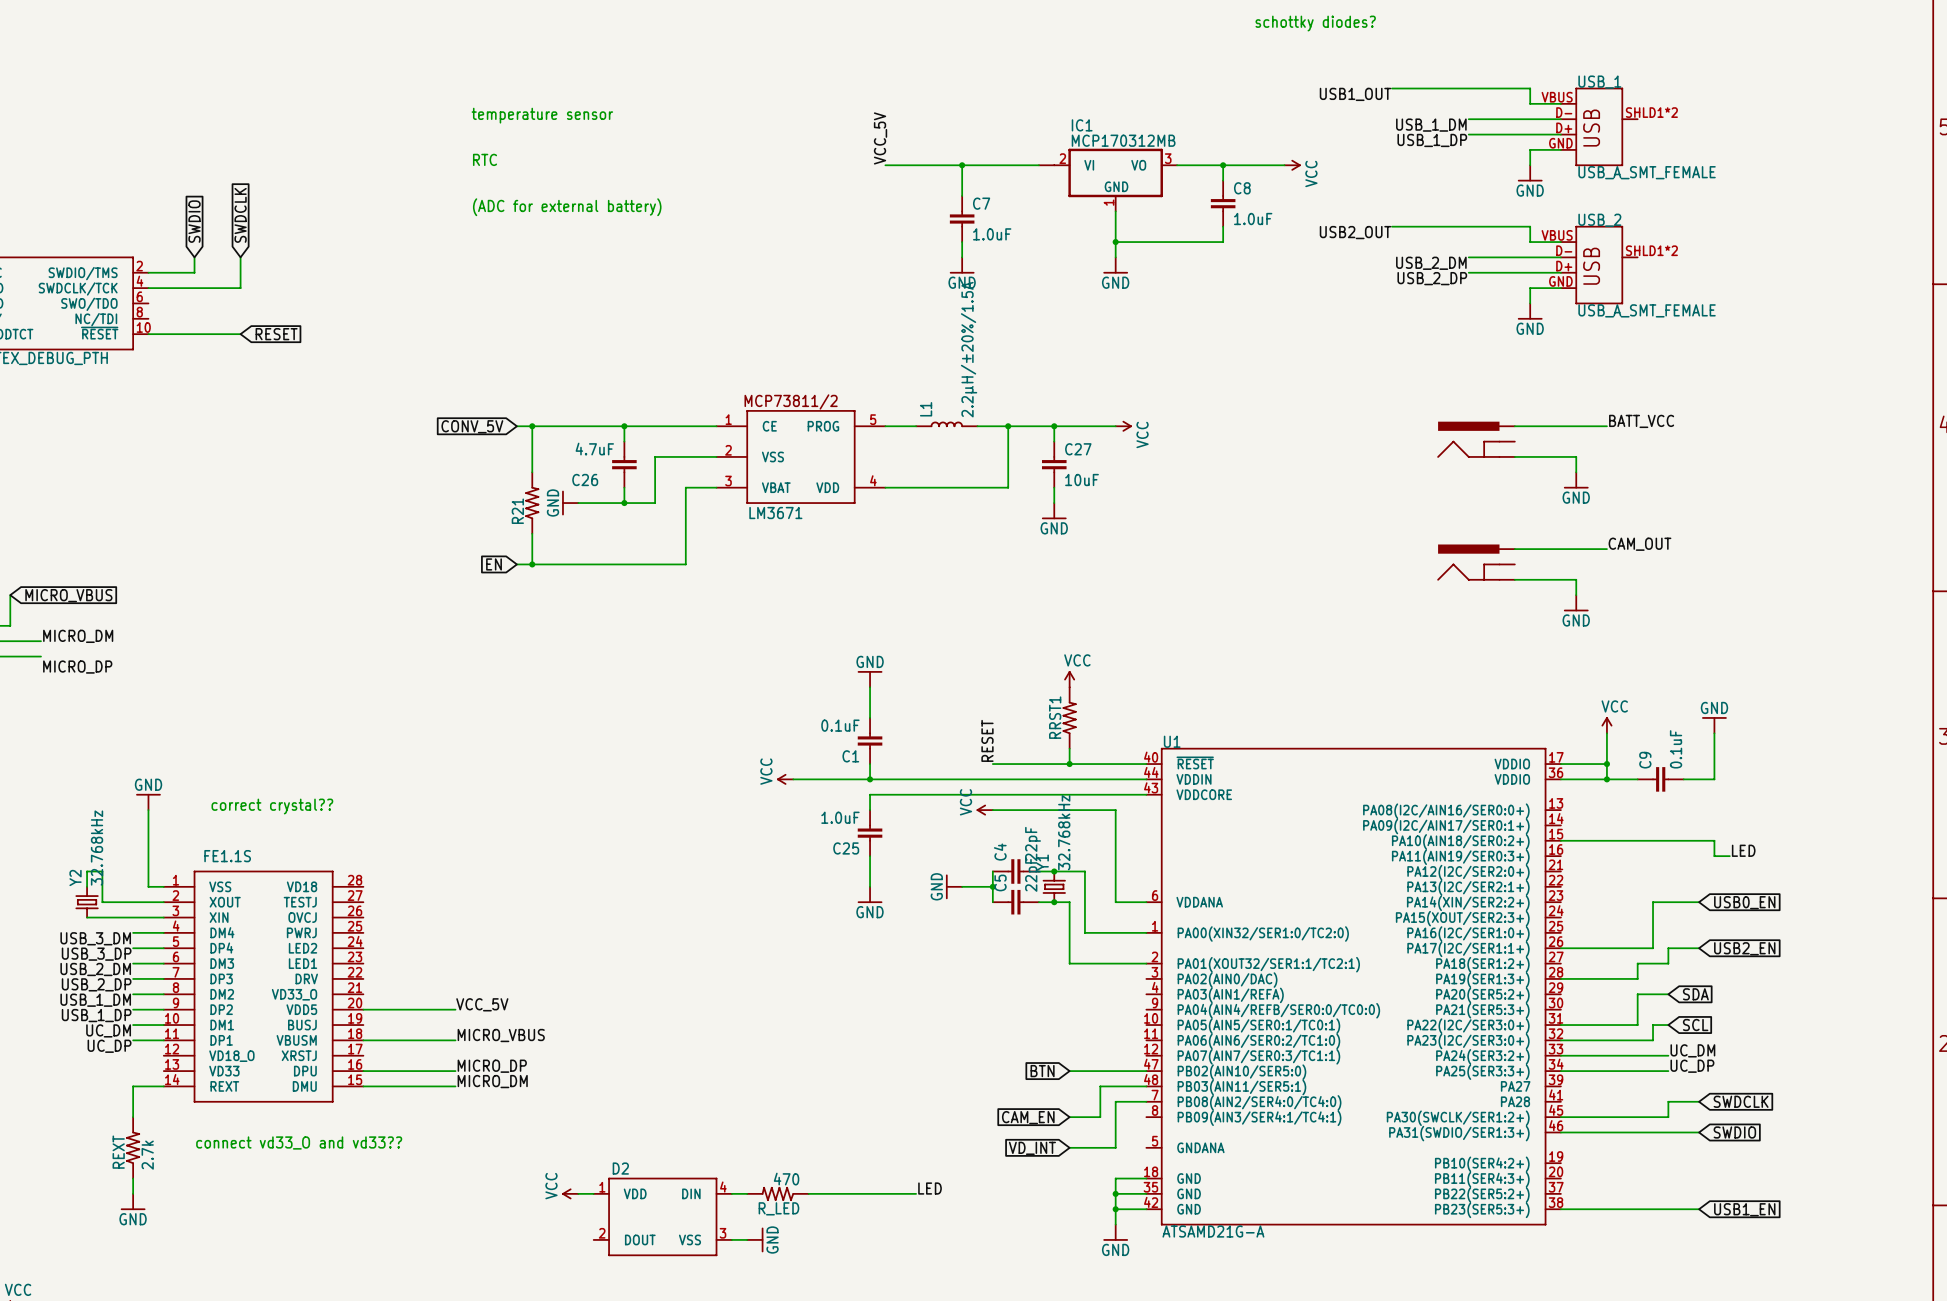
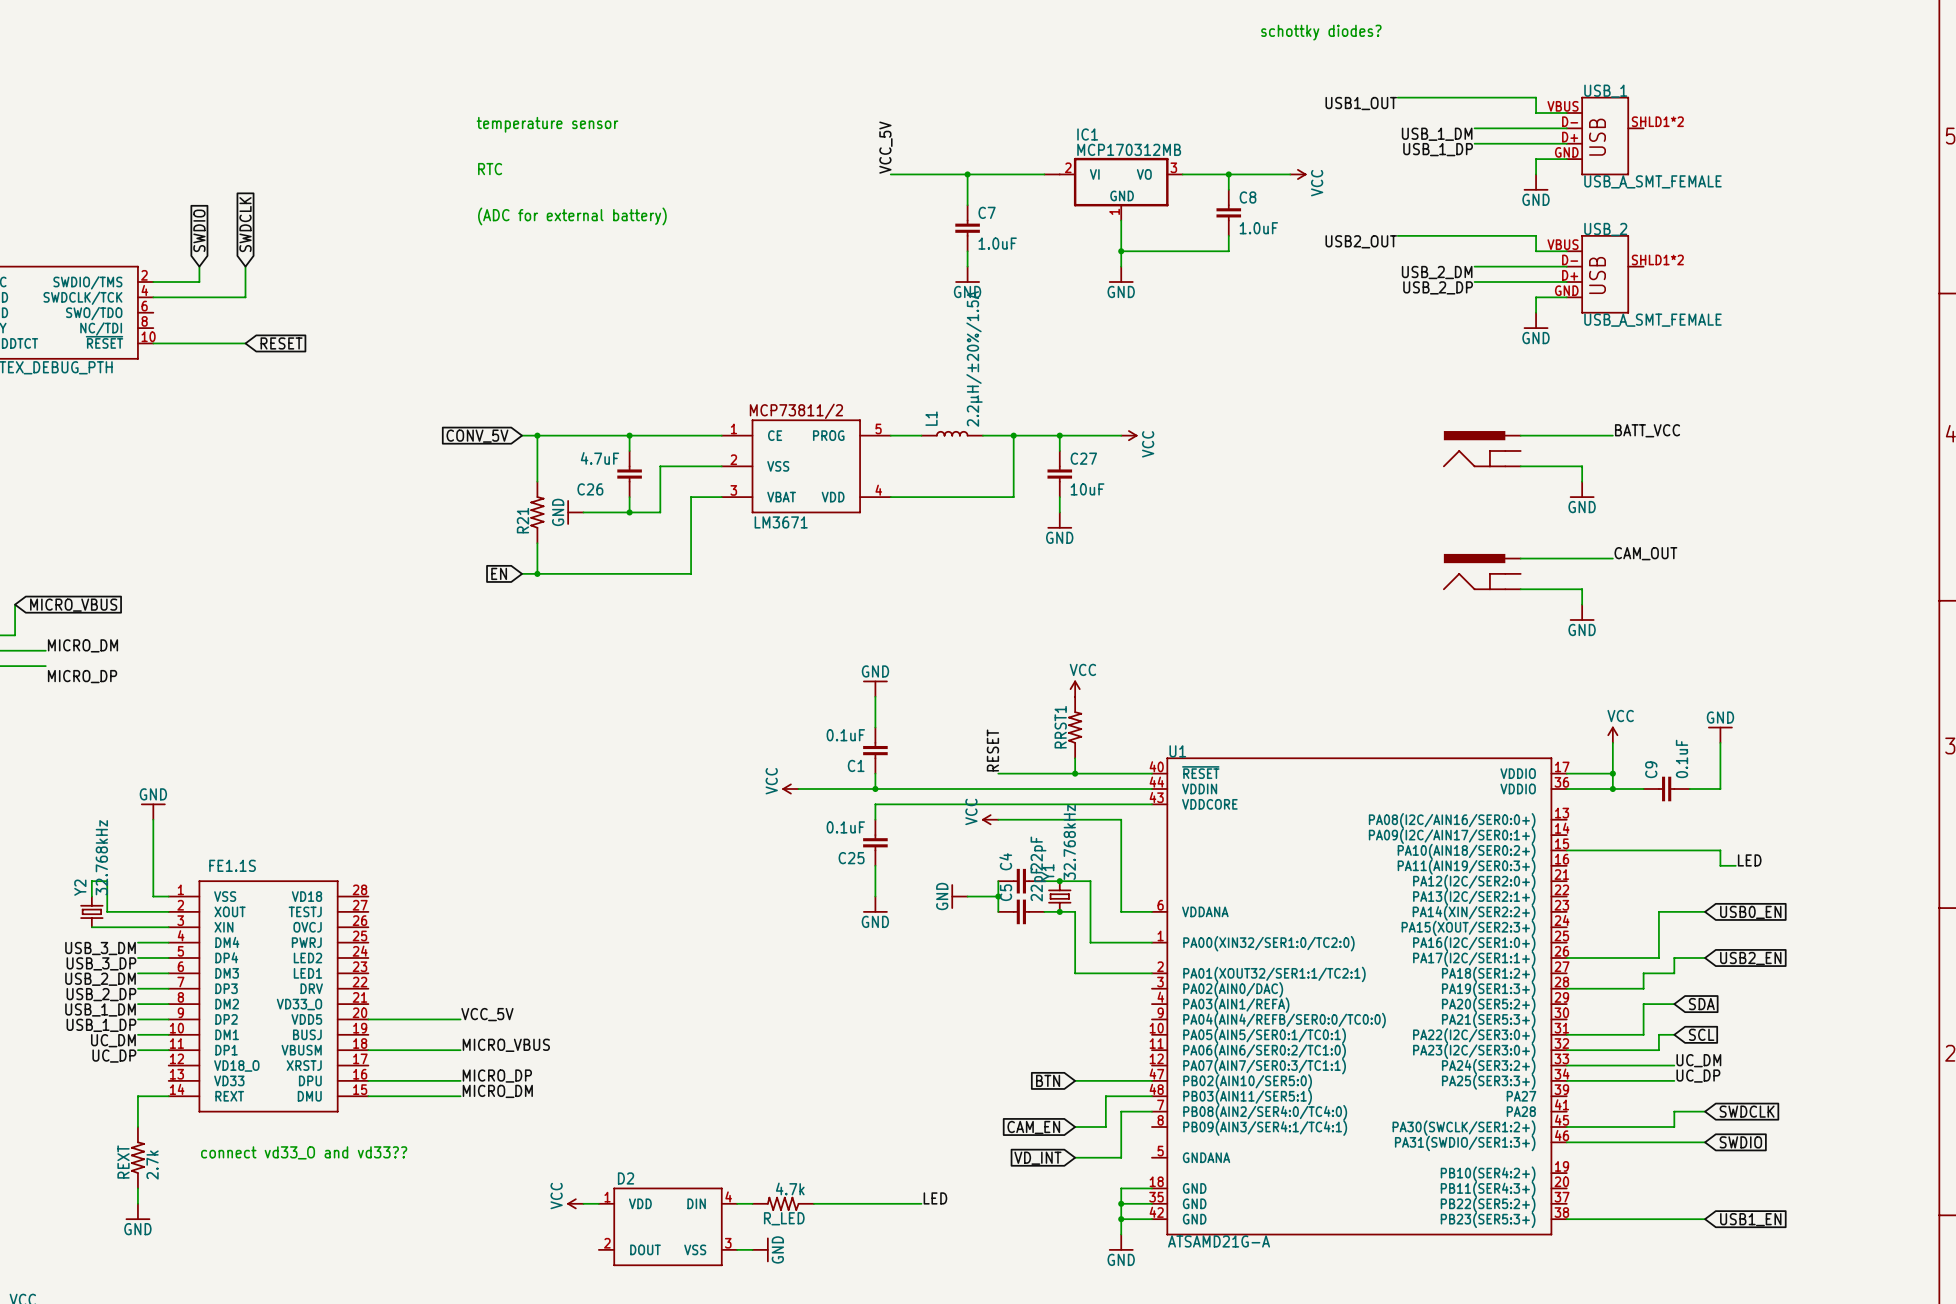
text: correct crystal?? (272, 806) -> none
C25 value: 1.0uF (840, 817) -> 0.1uF (845, 827)
R_LED value: 470 (786, 1179) -> 4.7k (790, 1188)

